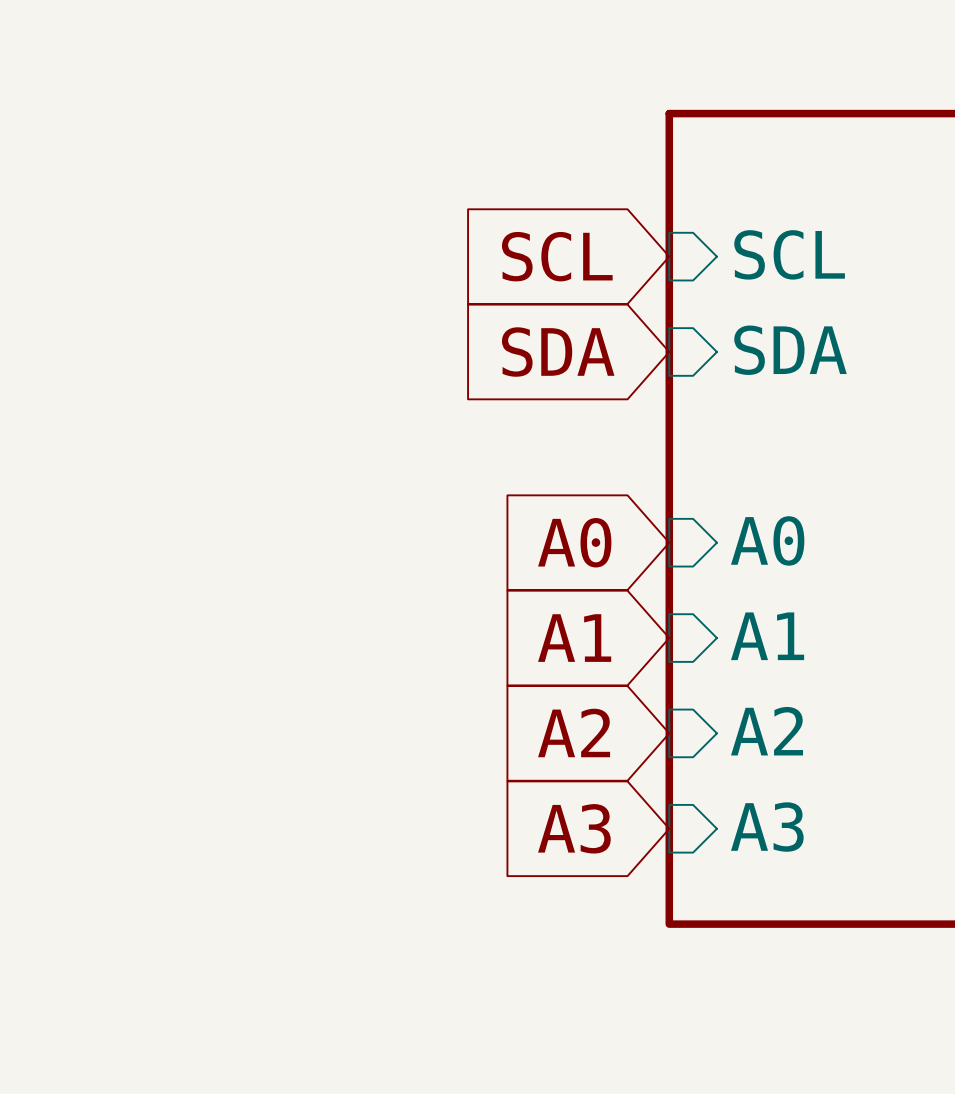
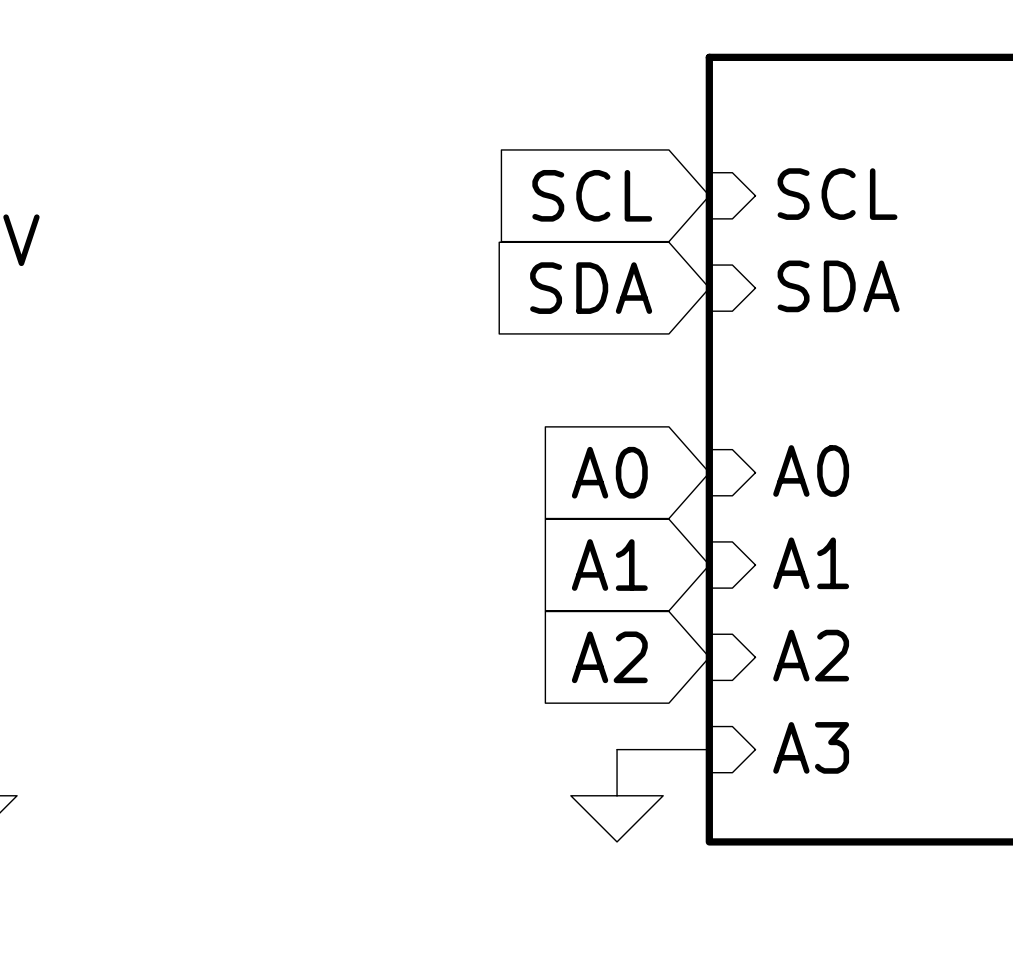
wire: none -> (617, 749) (709, 749)
global label: A3 (574, 828) -> none
power symbol: none -> (617, 795)

